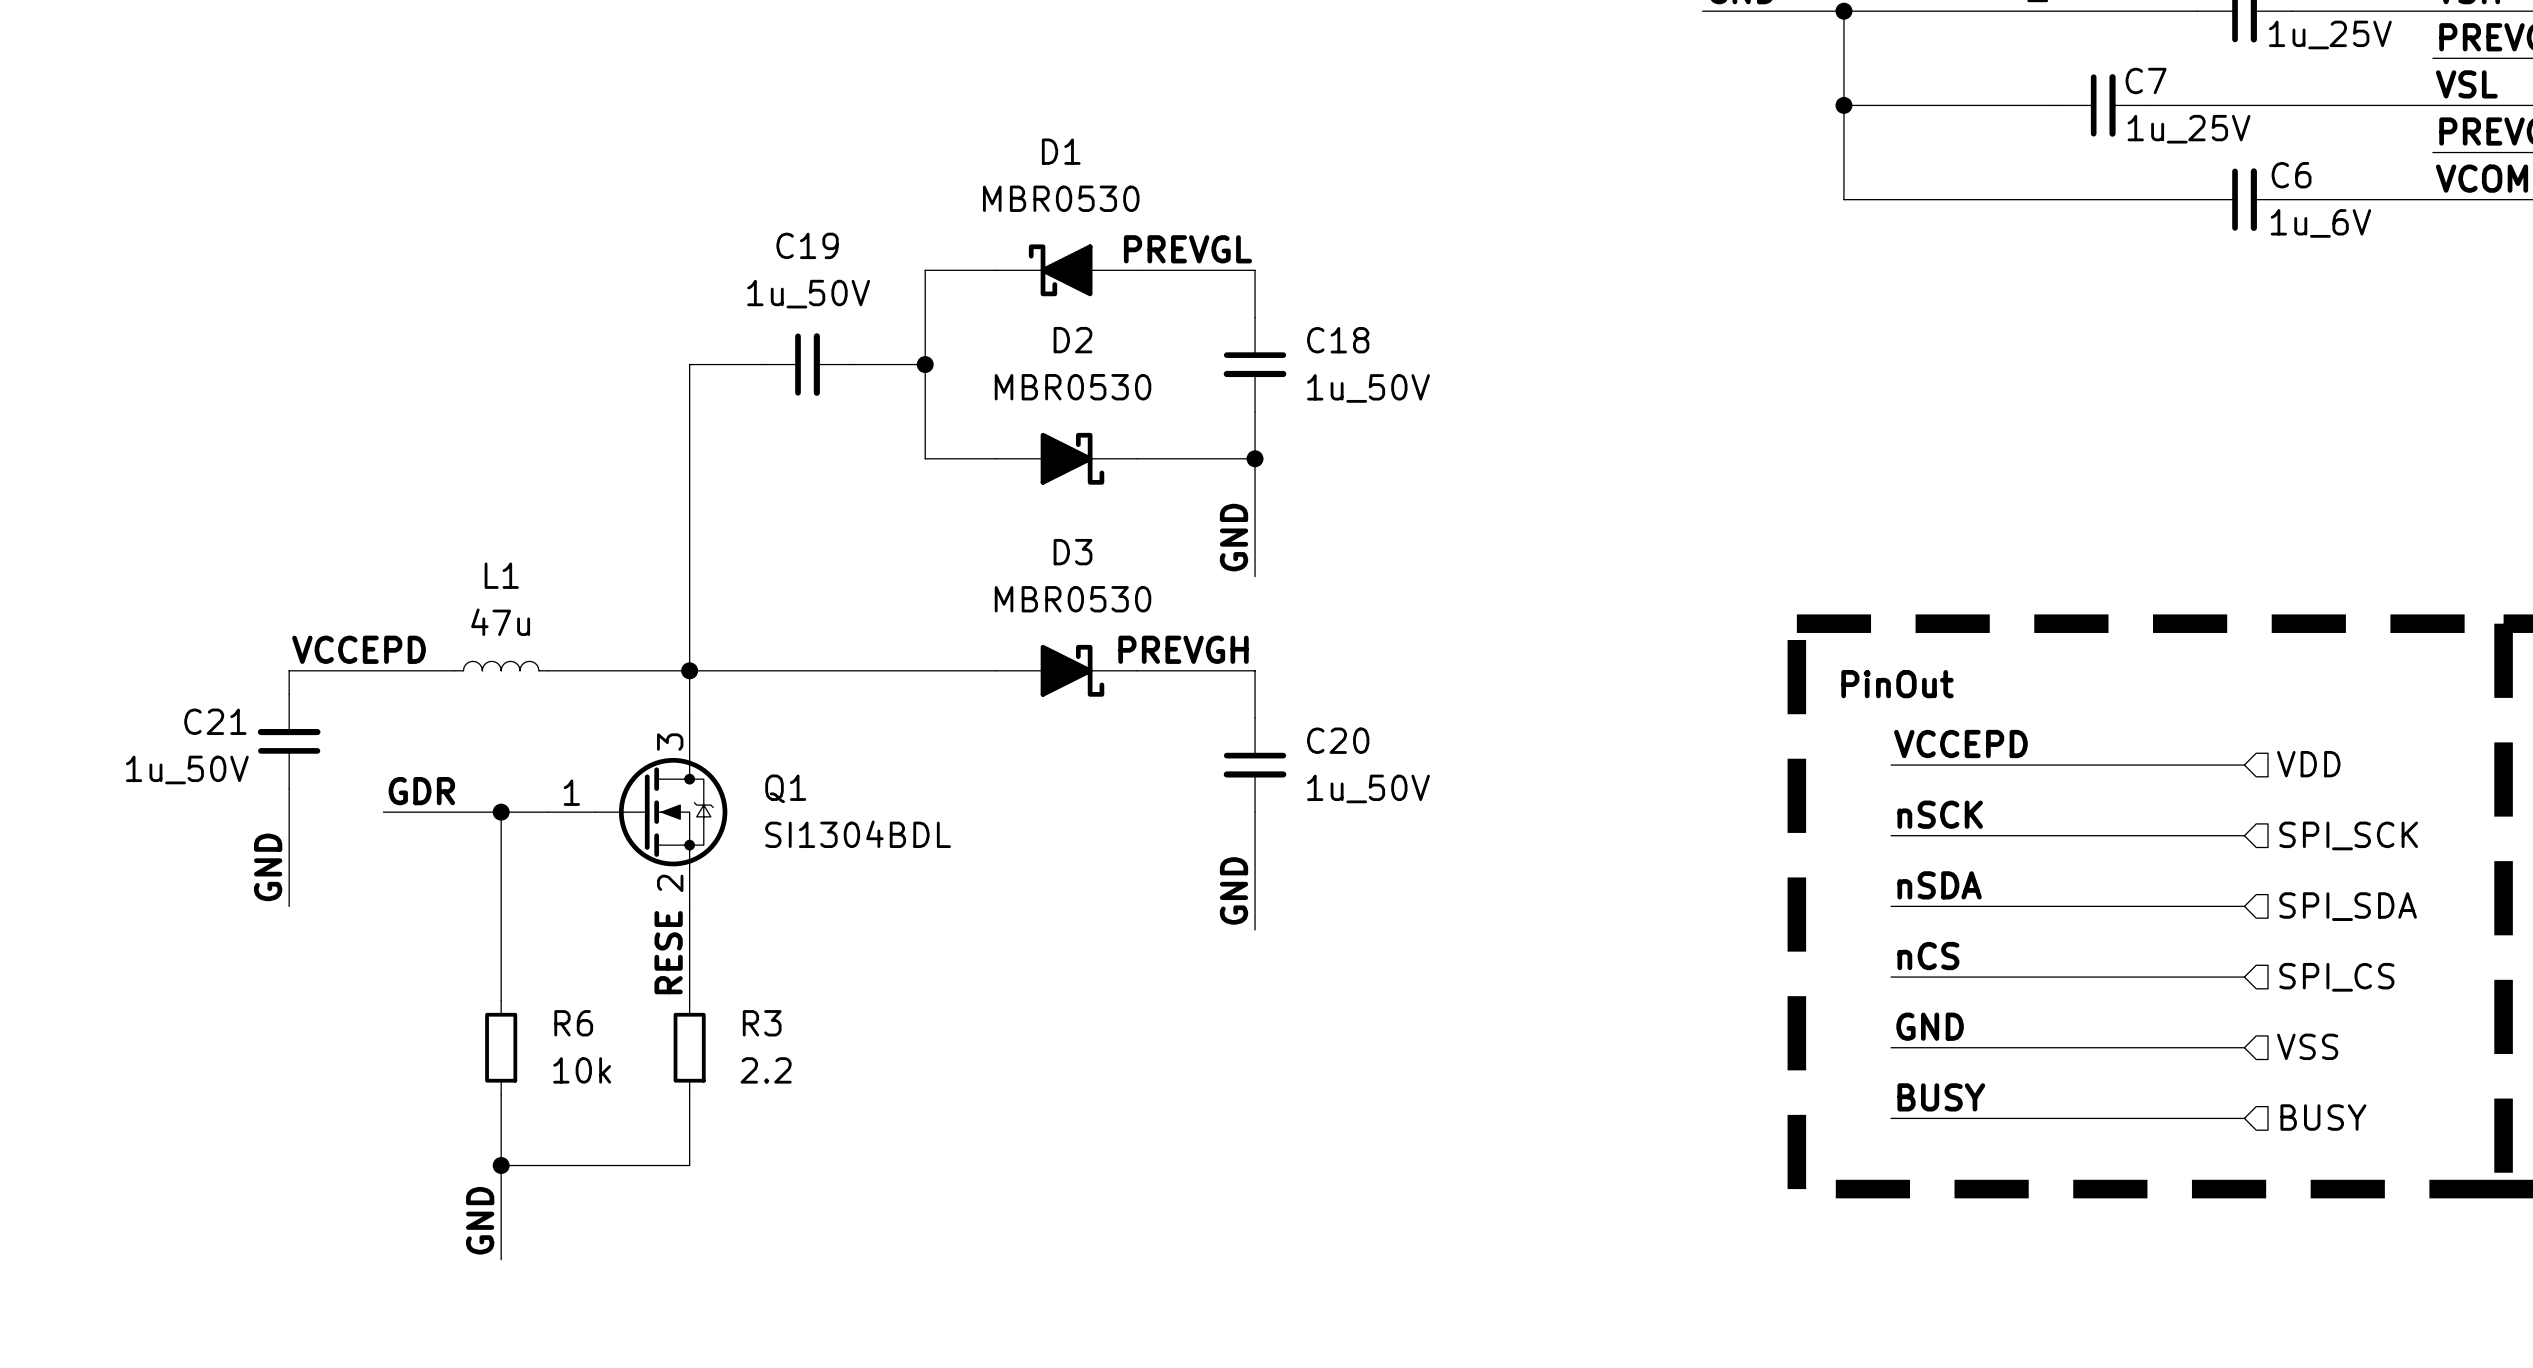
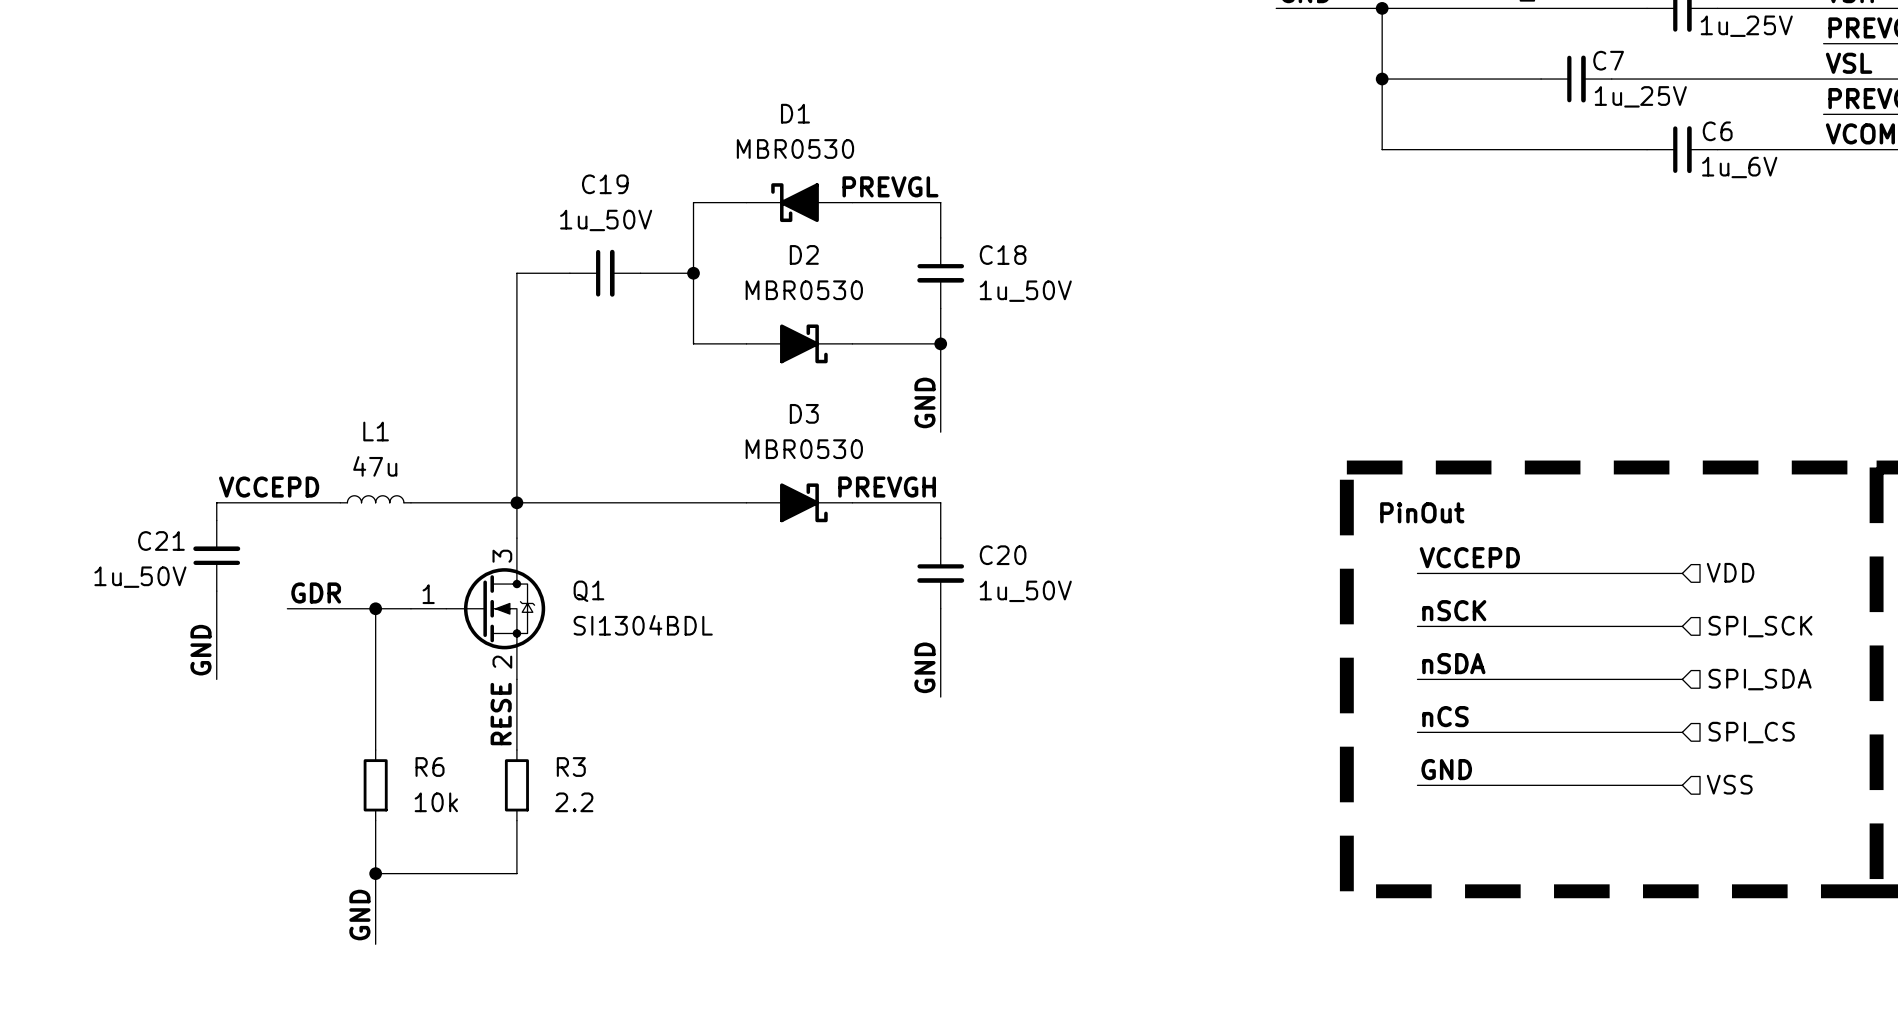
label: BUSY (1941, 1097) -> none
hierarchical label: BUSY (2323, 1117) -> none
wire: (1891, 1118) (2244, 1118) -> none

